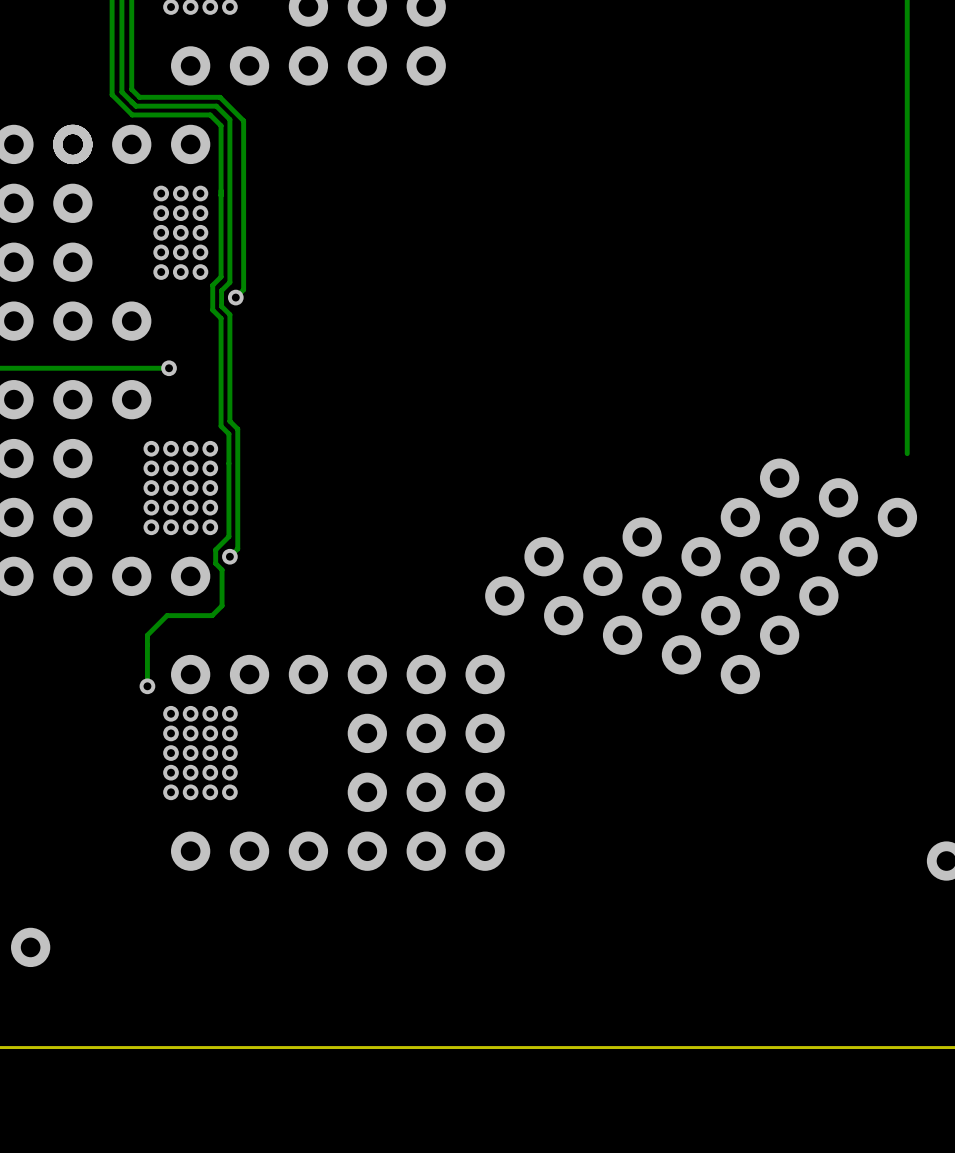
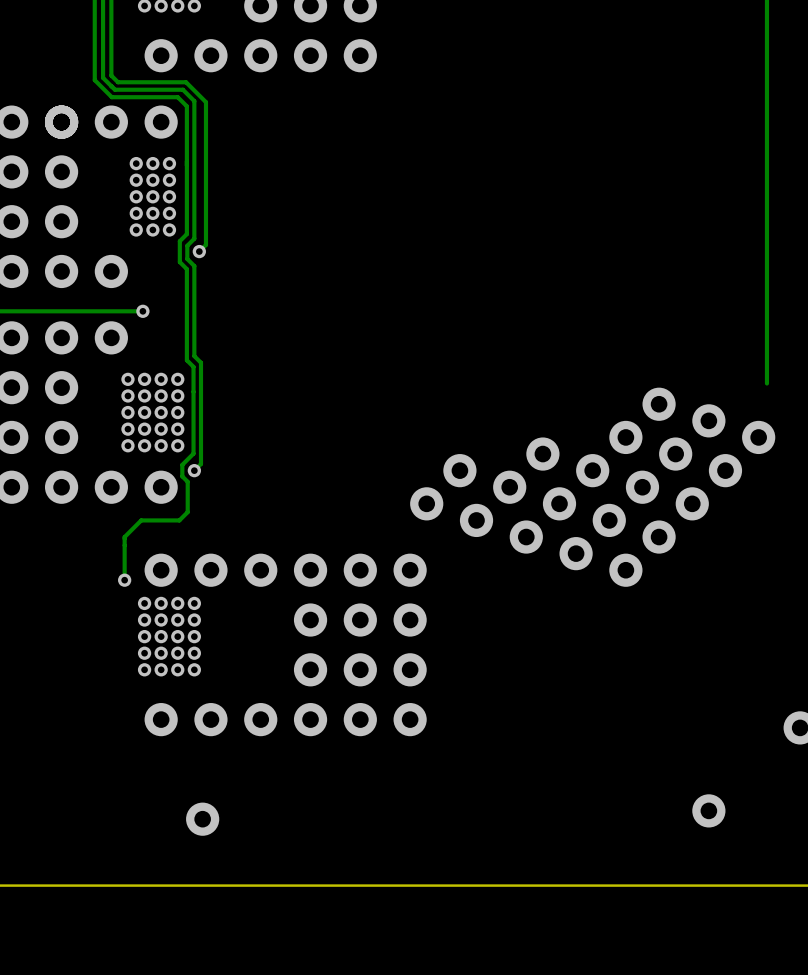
via: (30, 947) -> none
via: none -> (708, 810)
via: none -> (202, 819)

